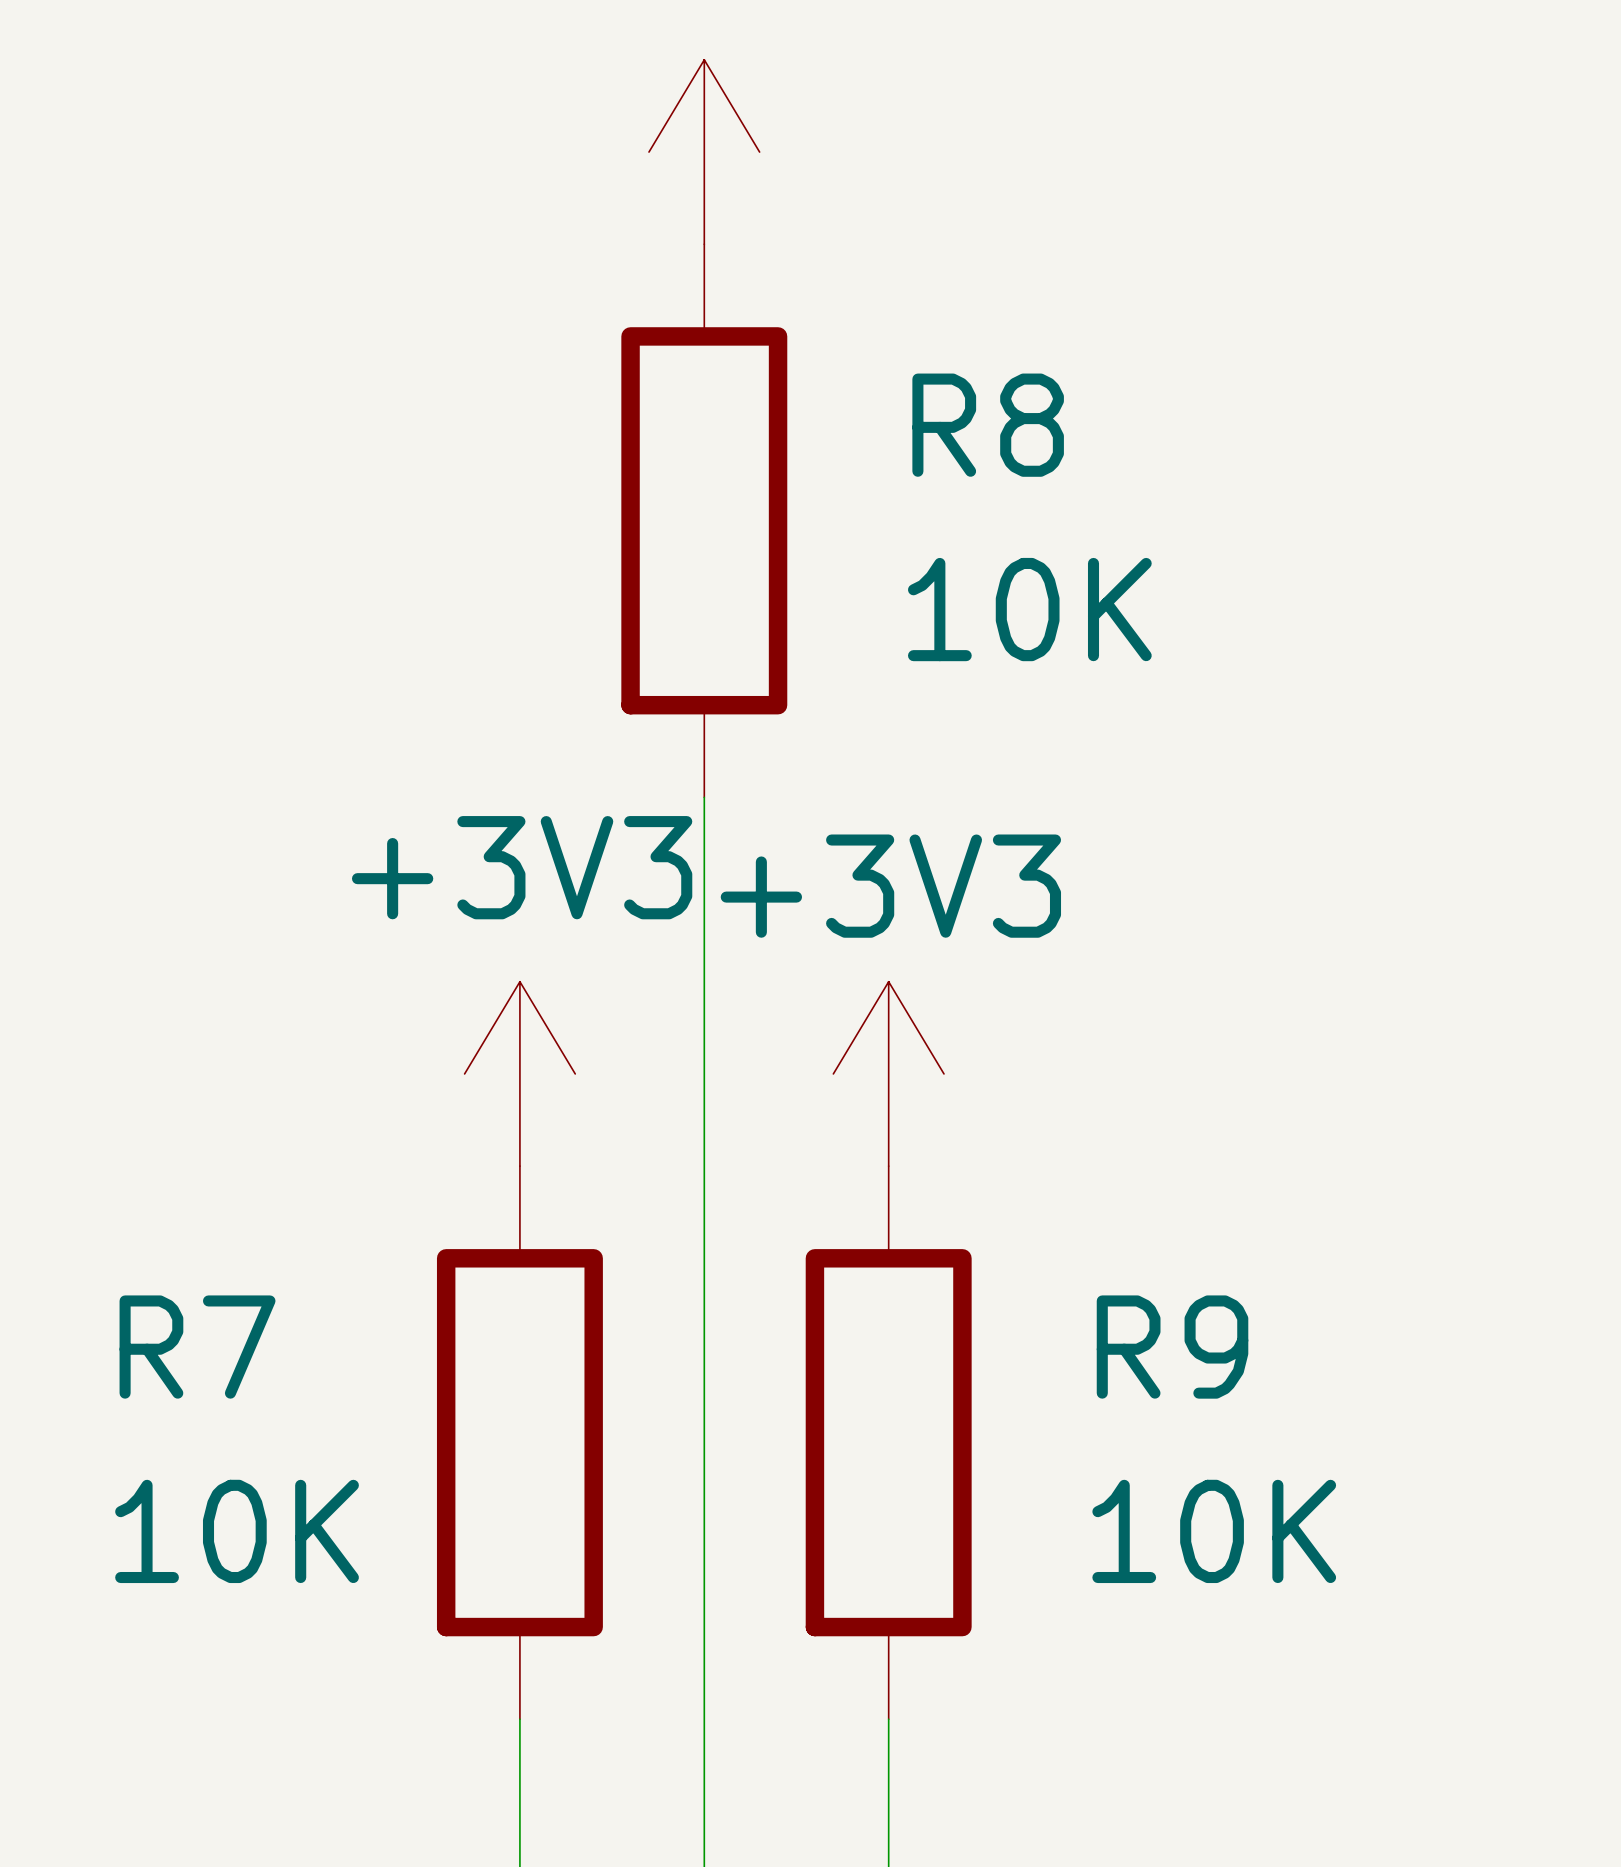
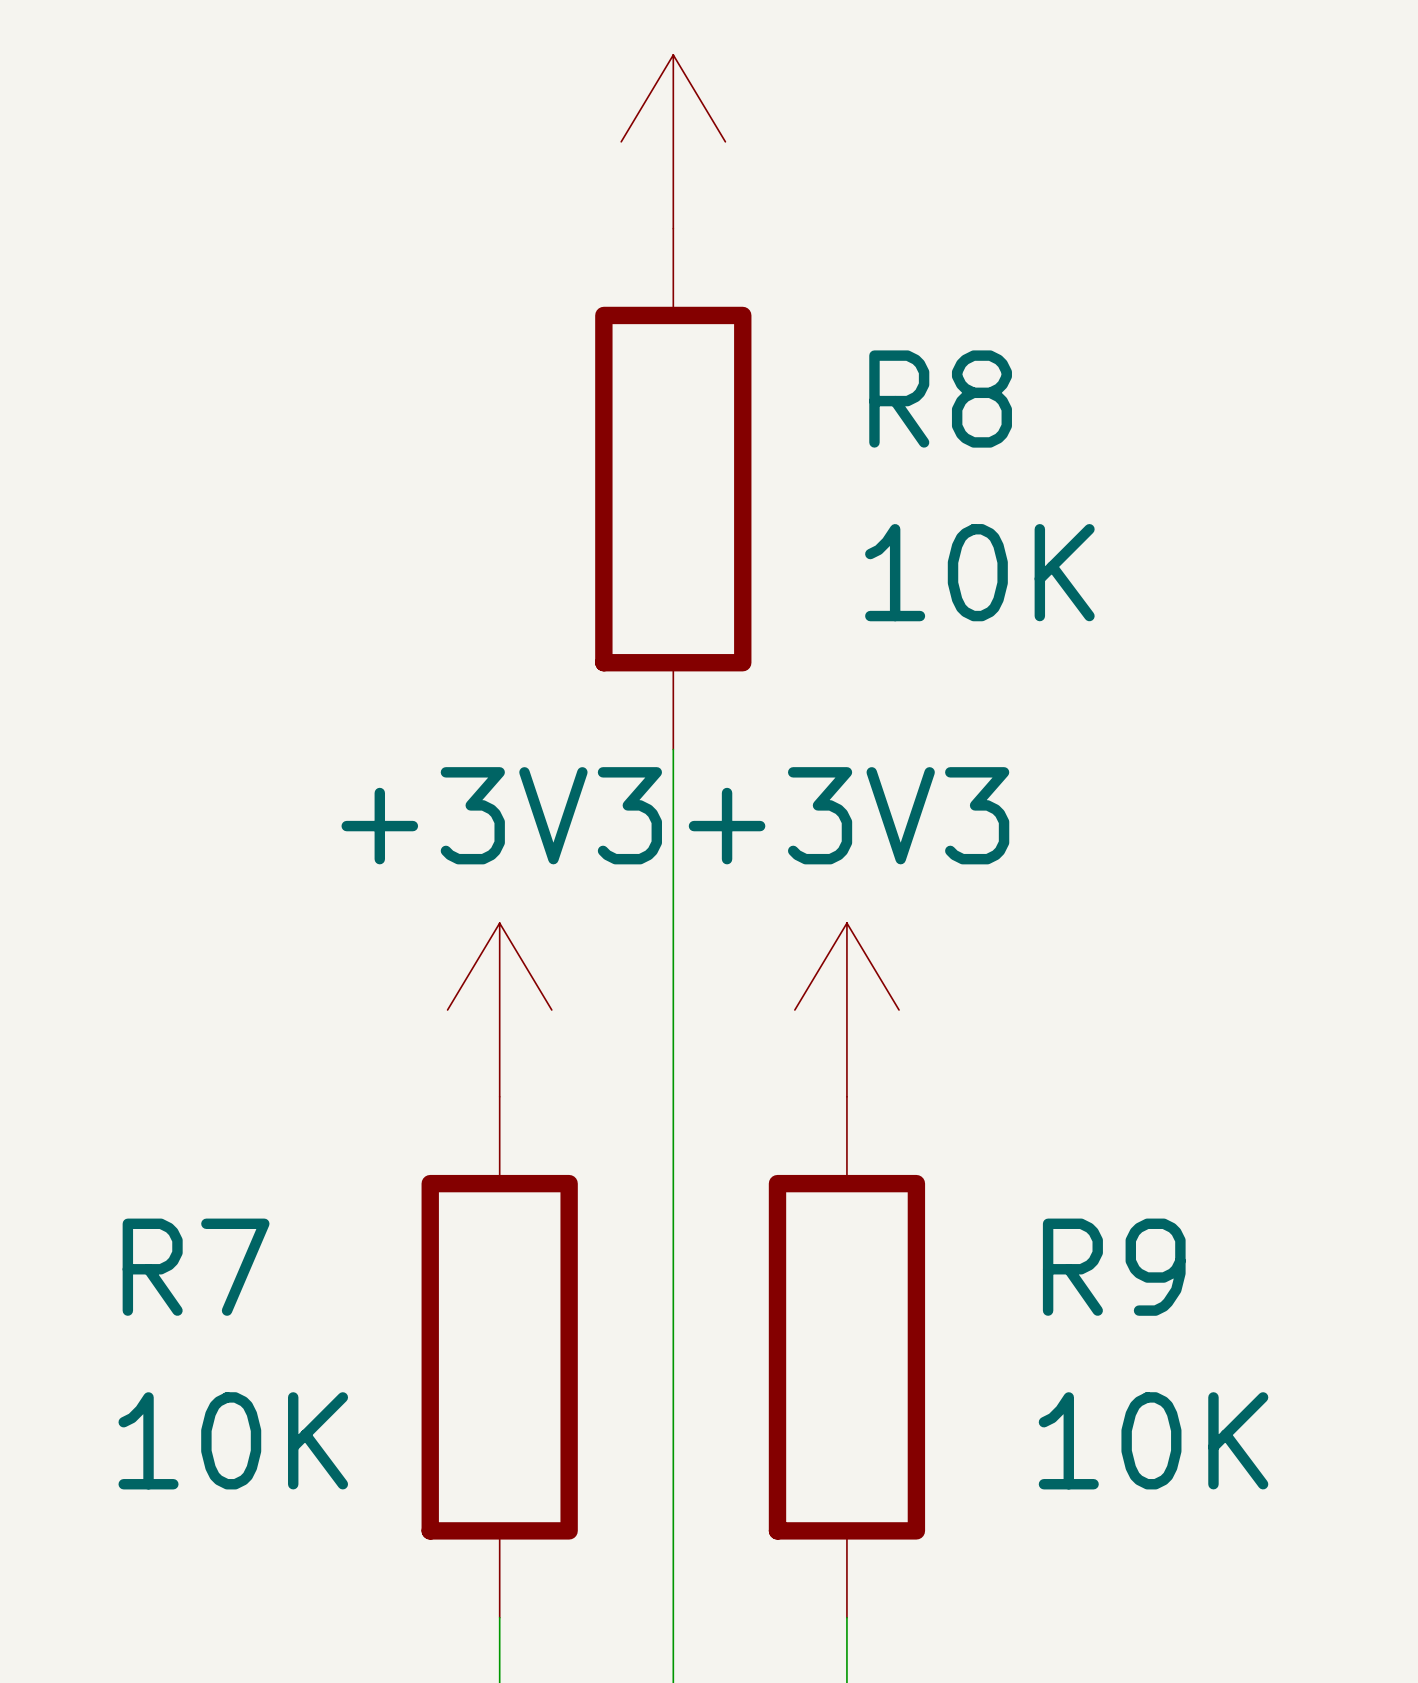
power symbol text position: +3V3 (890, 886) -> +3V3 (849, 815)

